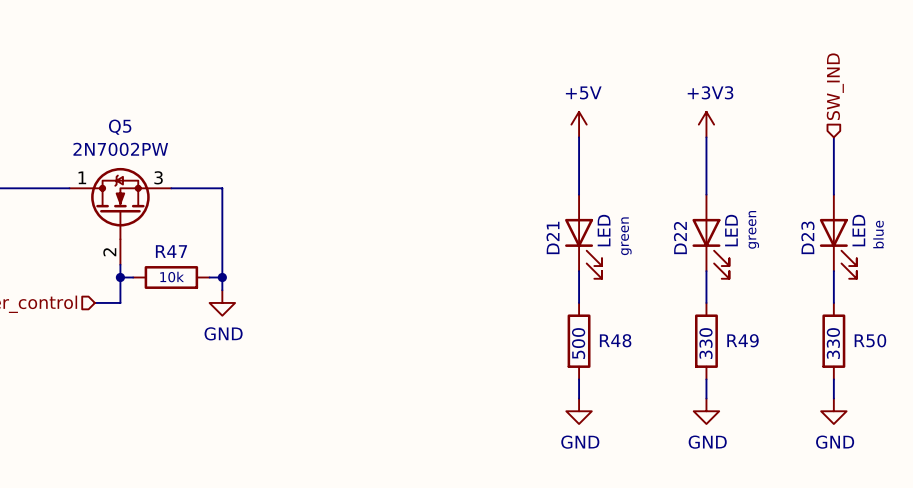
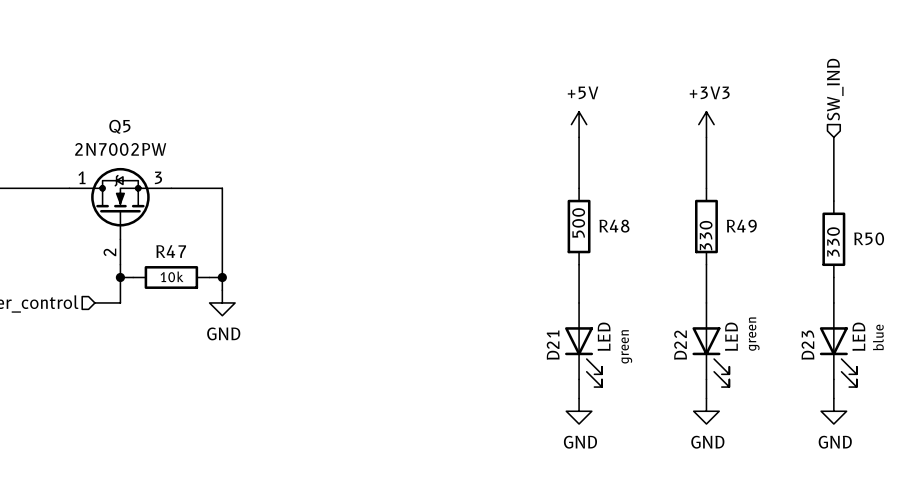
text: green (753, 229) -> none
text position: blue (878, 234) -> blue (878, 337)
D21 position: (583, 236) -> (583, 345)
text: green (626, 236) -> none
D22 position: (710, 236) -> (710, 345)
D23 position: (838, 236) -> (838, 345)
text: none -> green (754, 334)
R48 position: (579, 341) -> (579, 226)
R49 position: (706, 341) -> (706, 226)
R50 position: (833, 341) -> (833, 239)
R48 value position: 500 (578, 343) -> 500 (578, 222)
R49 value position: 330 (705, 343) -> 330 (706, 235)
text: none -> green (626, 346)

